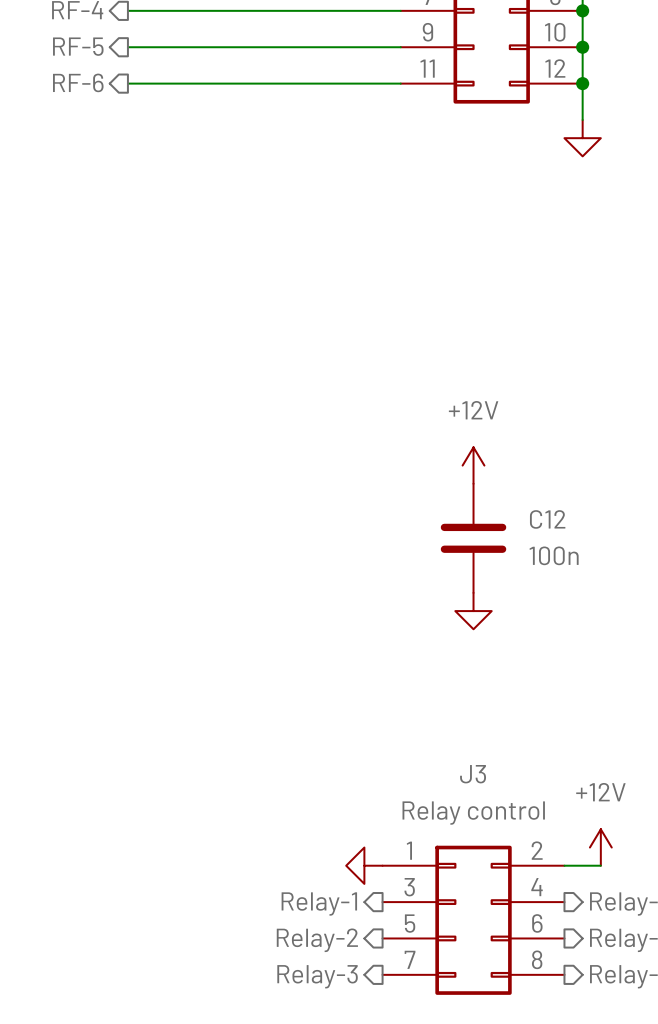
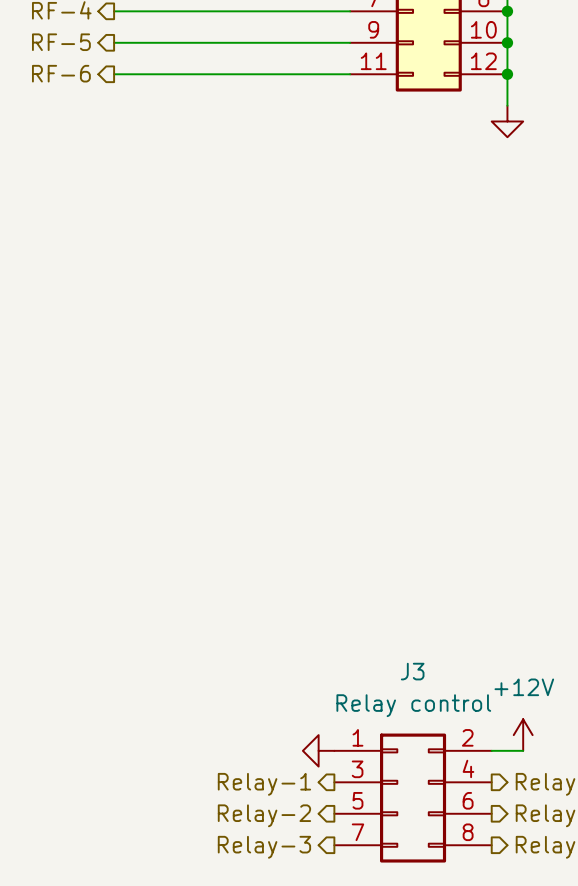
power symbol: +12V (473, 465) -> none
C12: 100n (473, 538) -> none
power symbol: (473, 611) -> none

